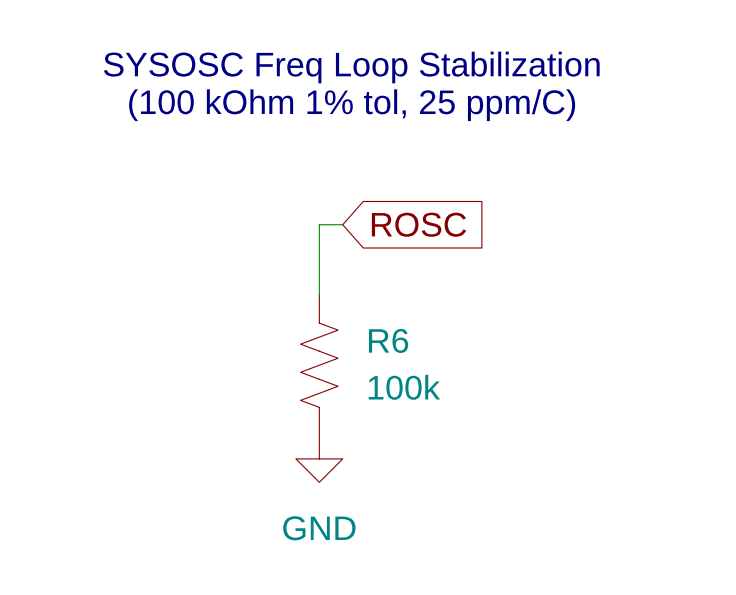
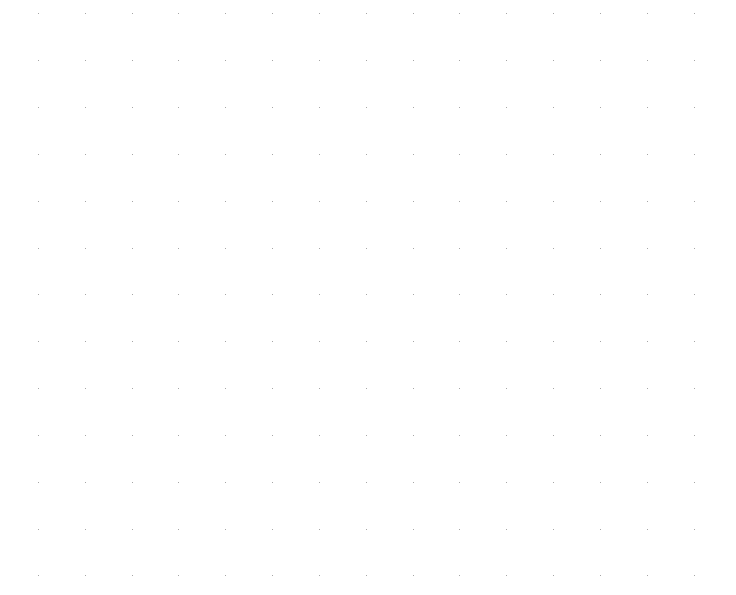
text: SYSOSC Freq Loop Stabilization (351, 67) -> none
text: (100 kOhm 1% tol, 25 ppm/C) (352, 105) -> none
wire: (342, 224) (319, 224) (319, 294) -> none
global label: ROSC (419, 224) -> none
R6: 100k (319, 365) -> none
power symbol: GND (319, 458) -> none

